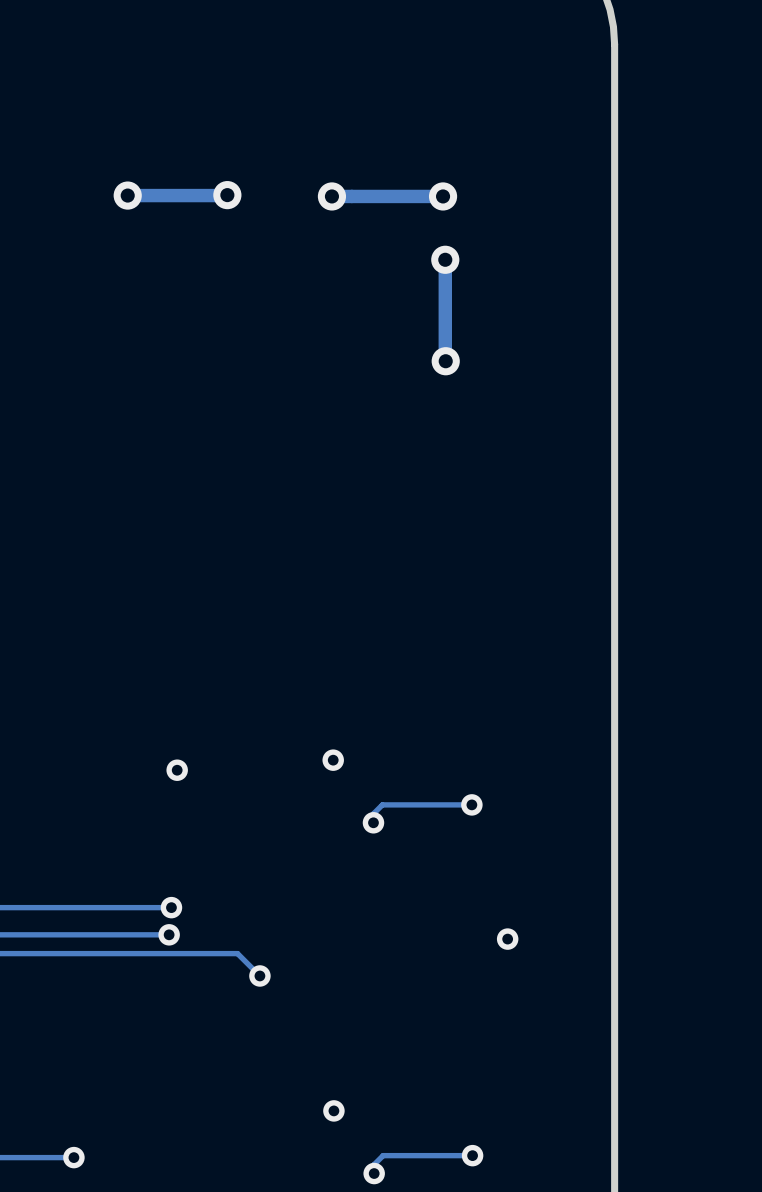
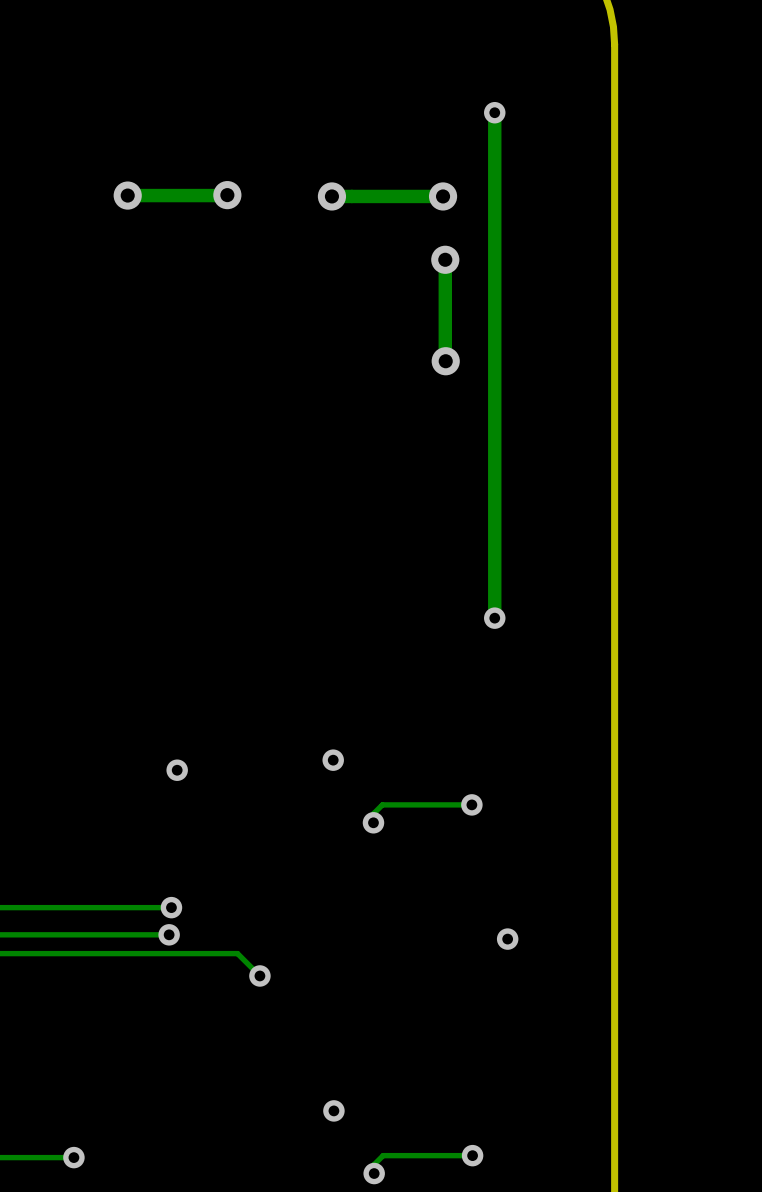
track: none -> (494, 112) (494, 618)
via: none -> (494, 112)
via: none -> (494, 618)

